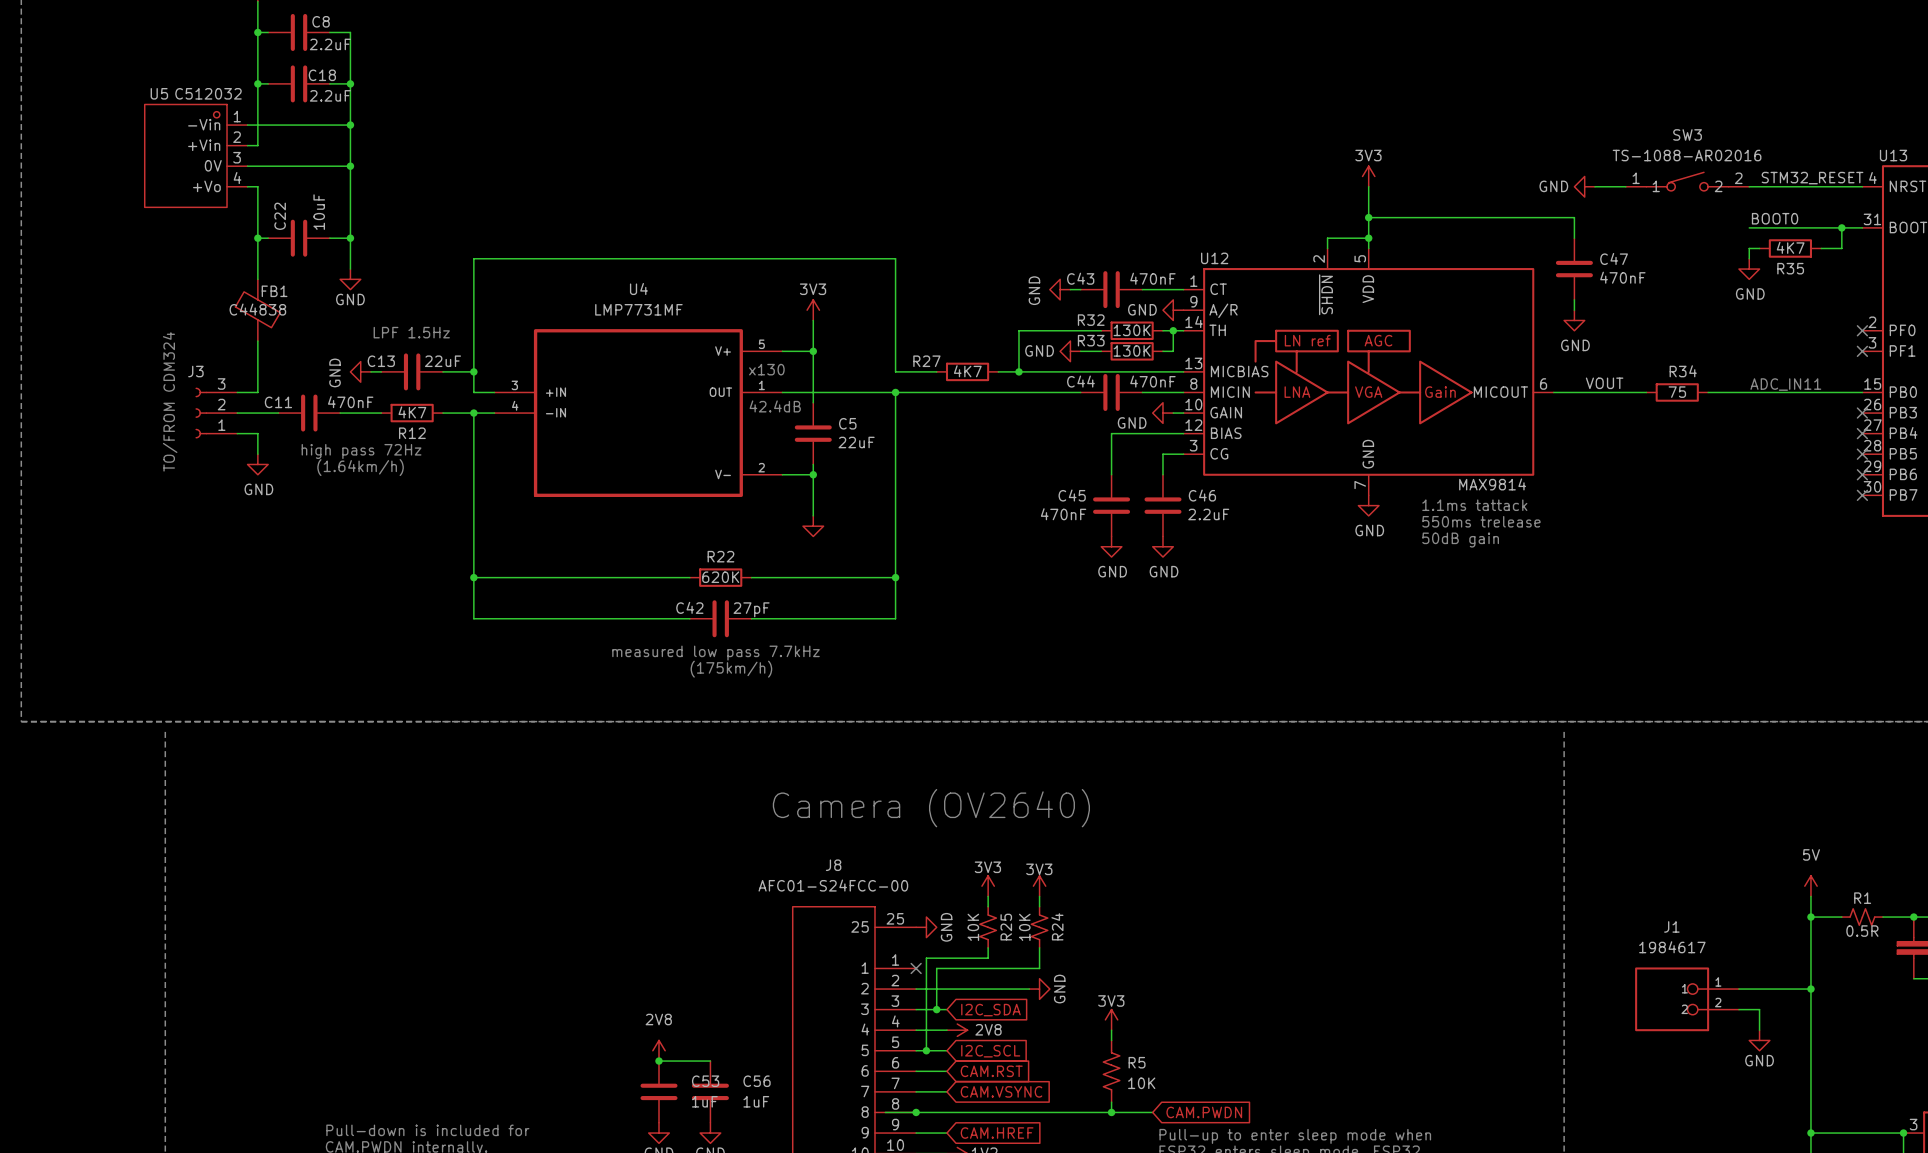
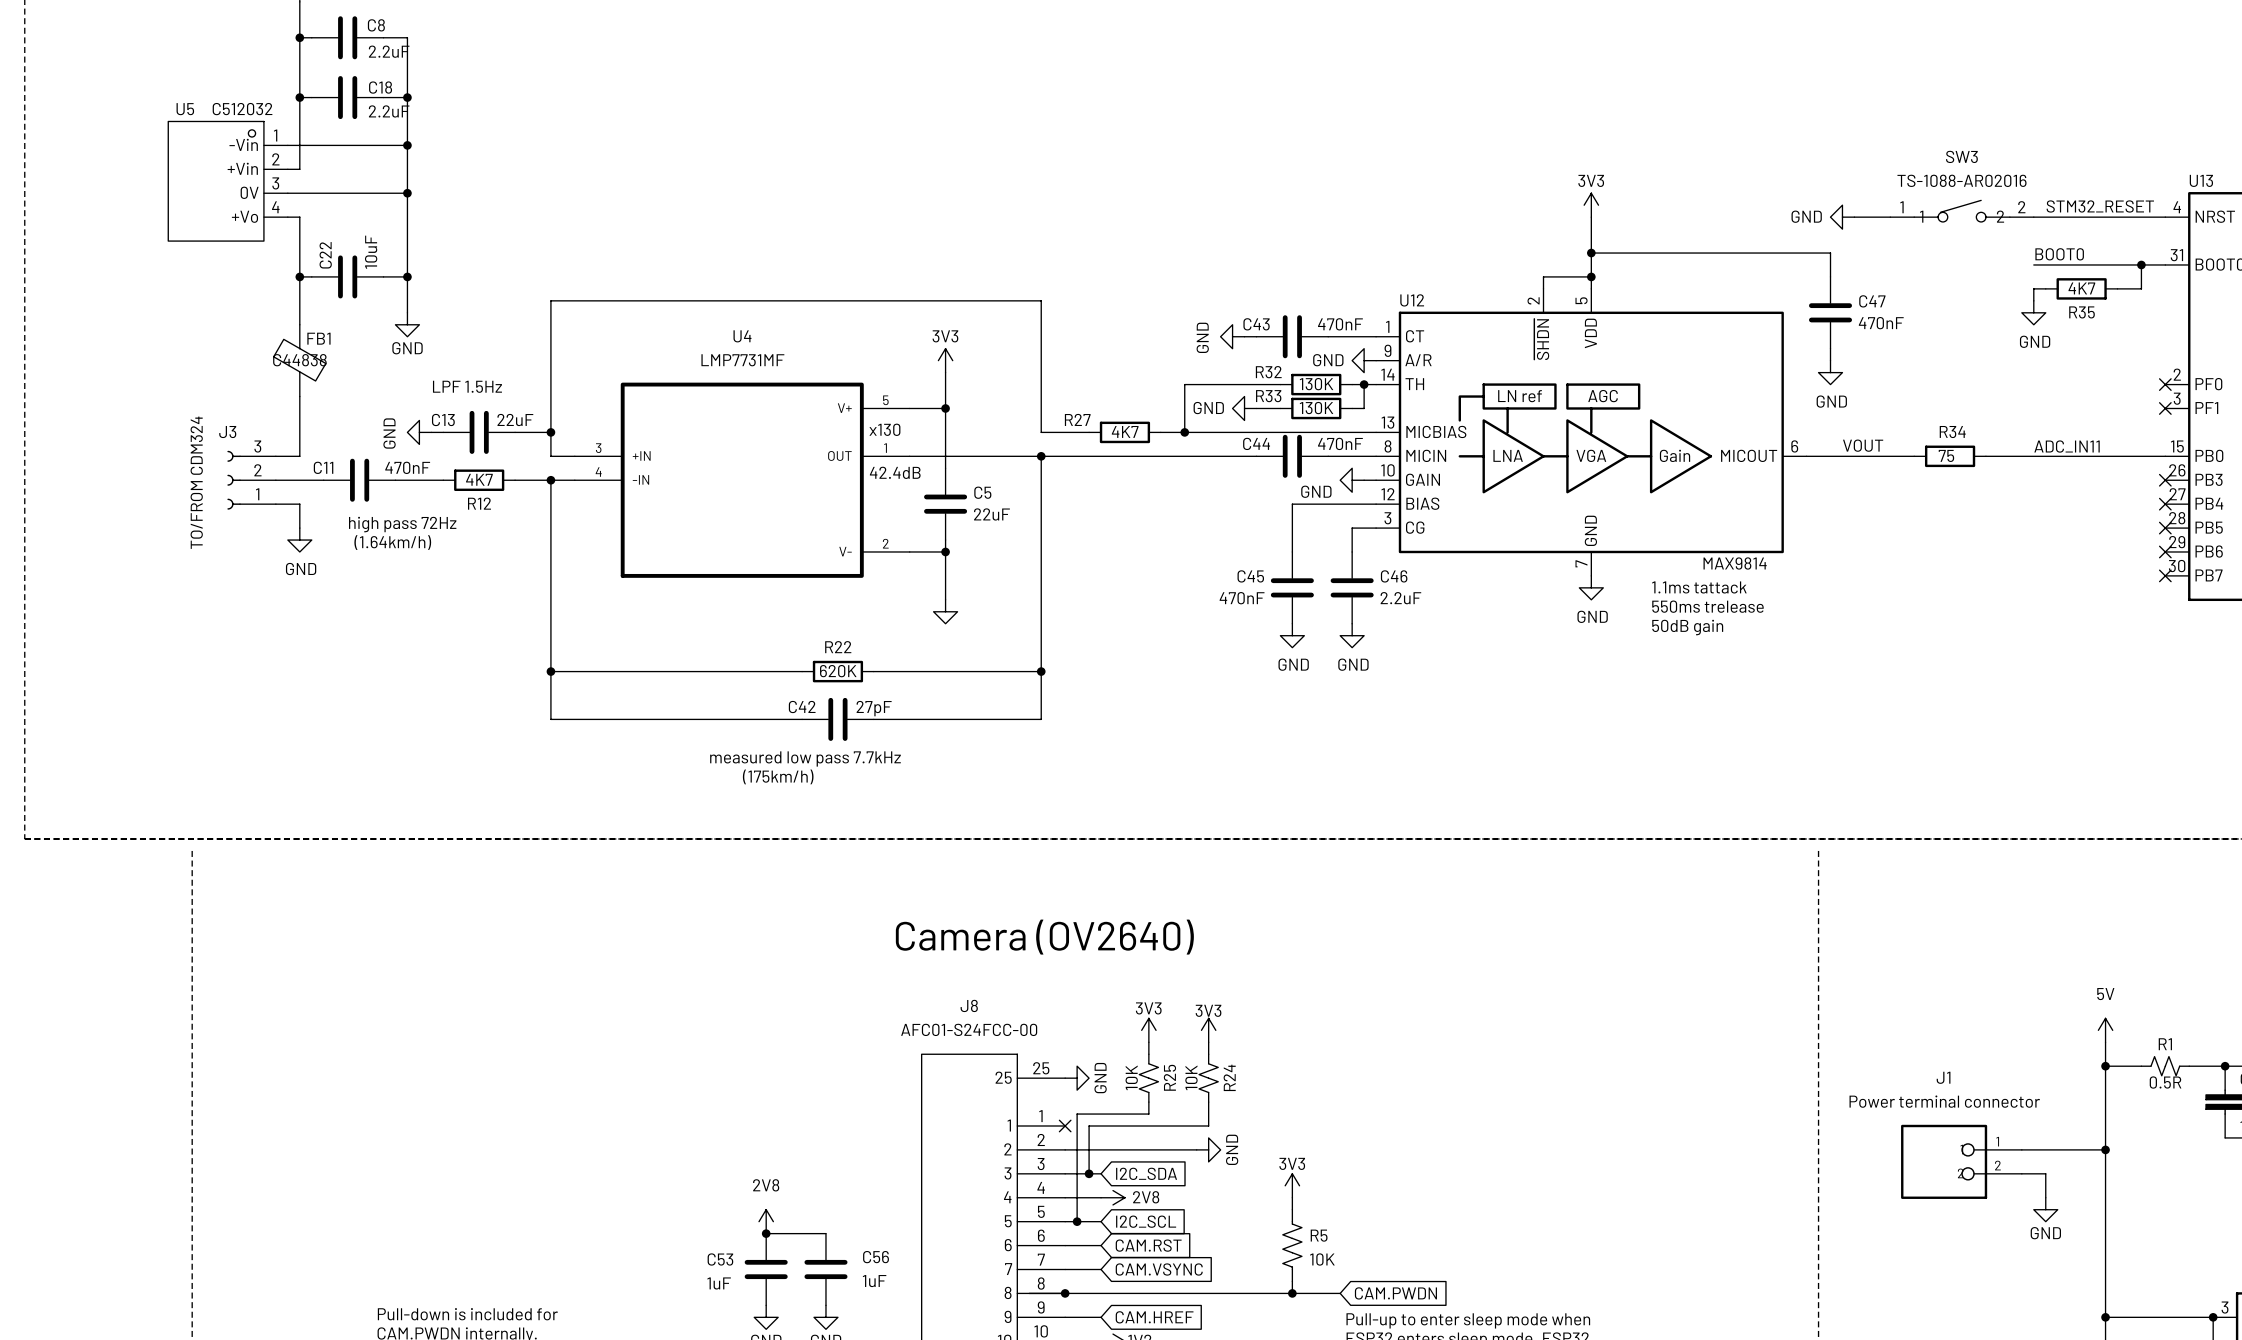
J1 value: 1984617 (1672, 947) -> Power terminal connector (1944, 1101)
C53 name position: C53 (705, 1081) -> C53 (720, 1259)
C53 text position: 1uF (704, 1101) -> 1uF (719, 1283)

